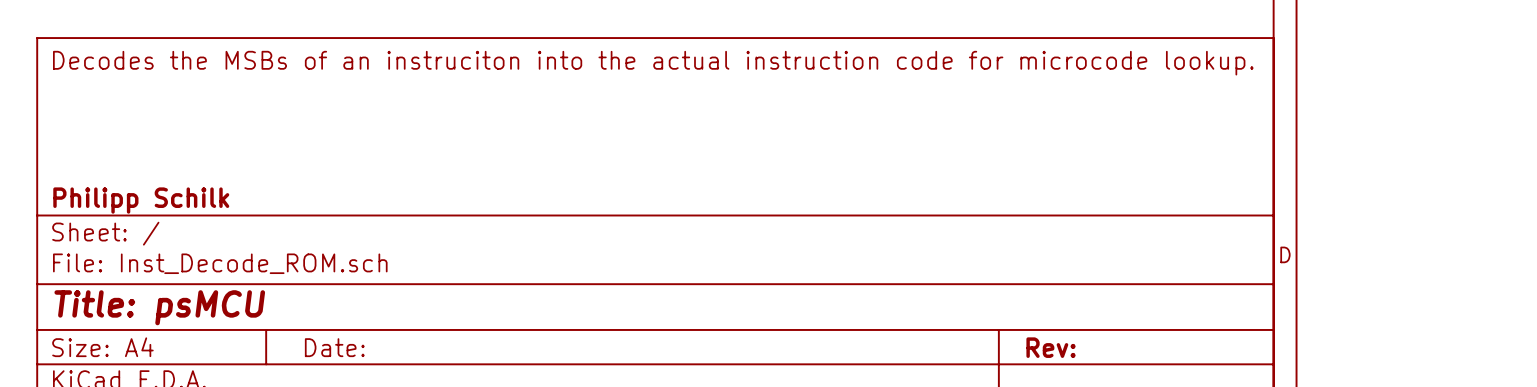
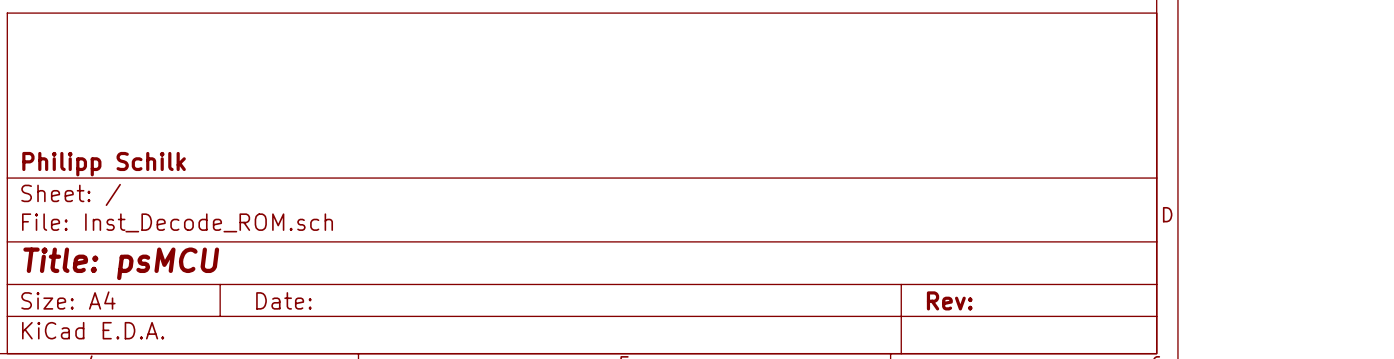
title block: Decodes the MSBs of an instruciton into the actual instruction code for microcode lookup. (653, 63) -> none

